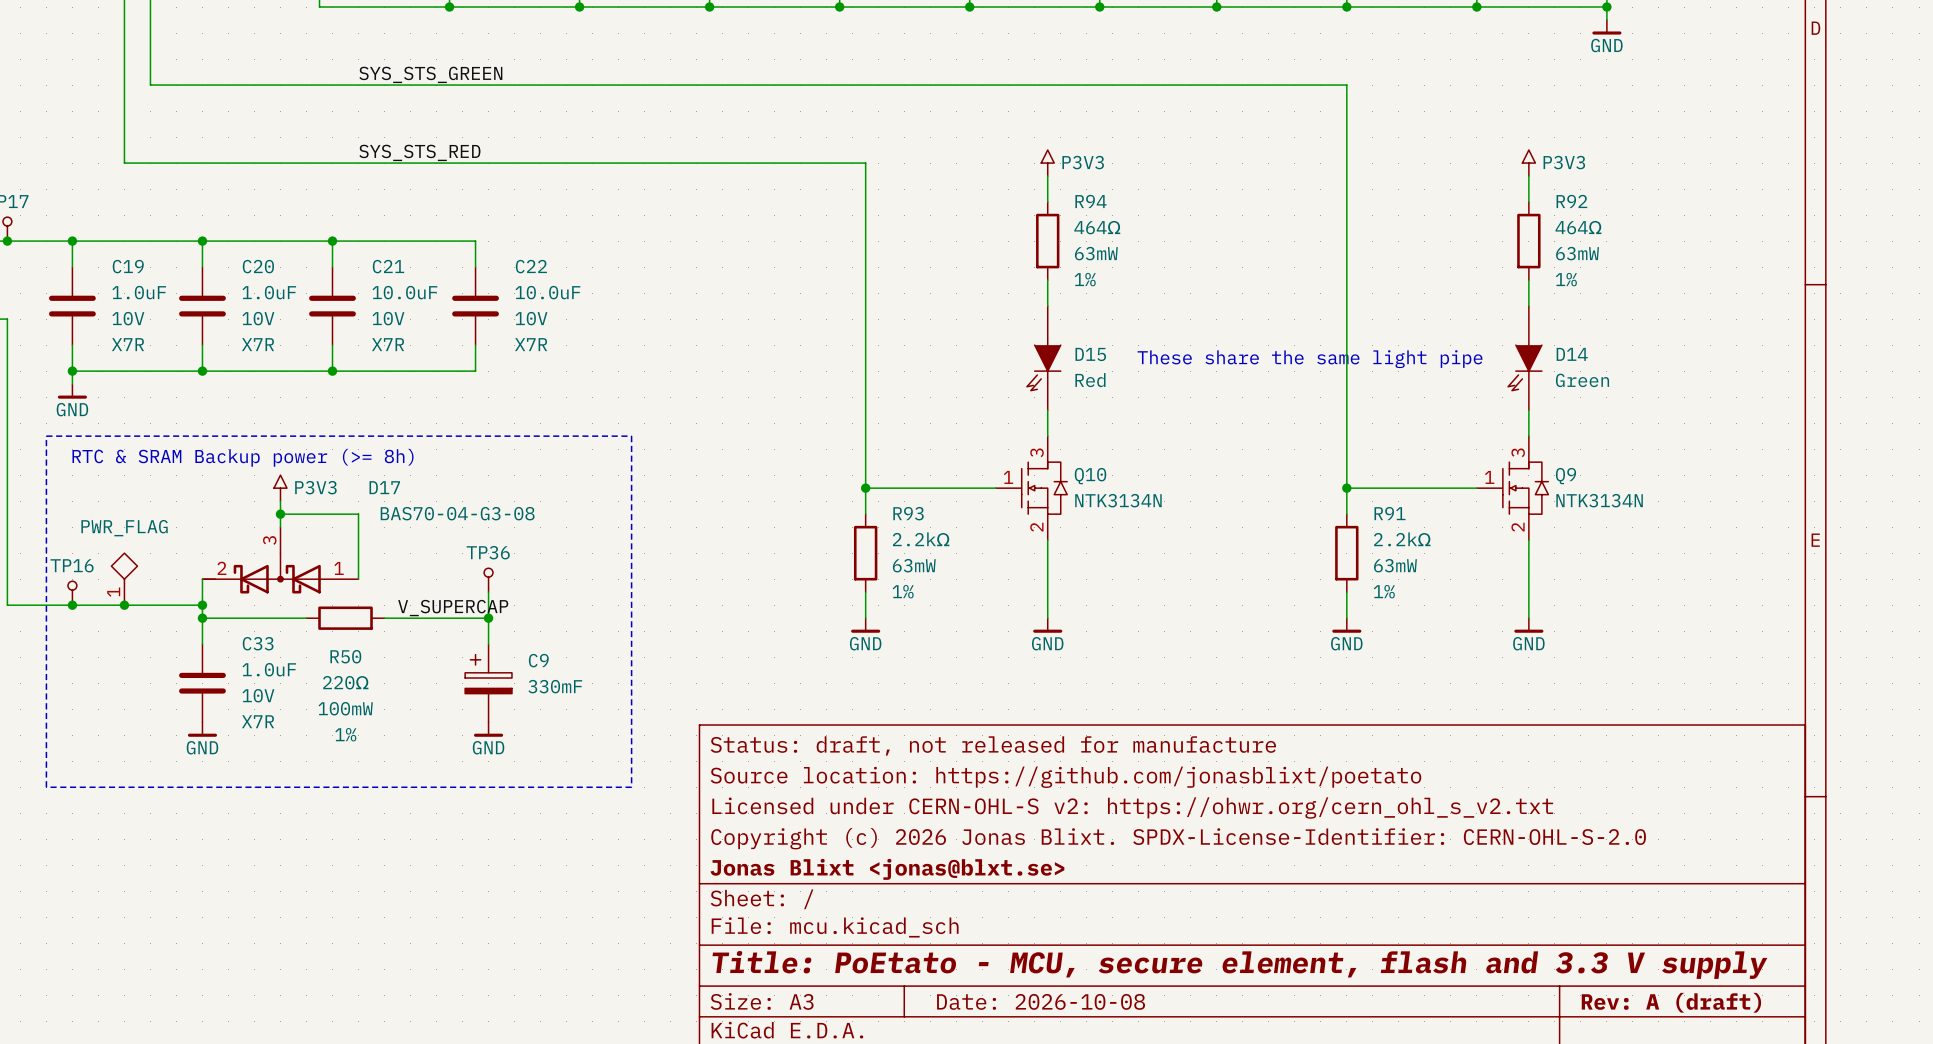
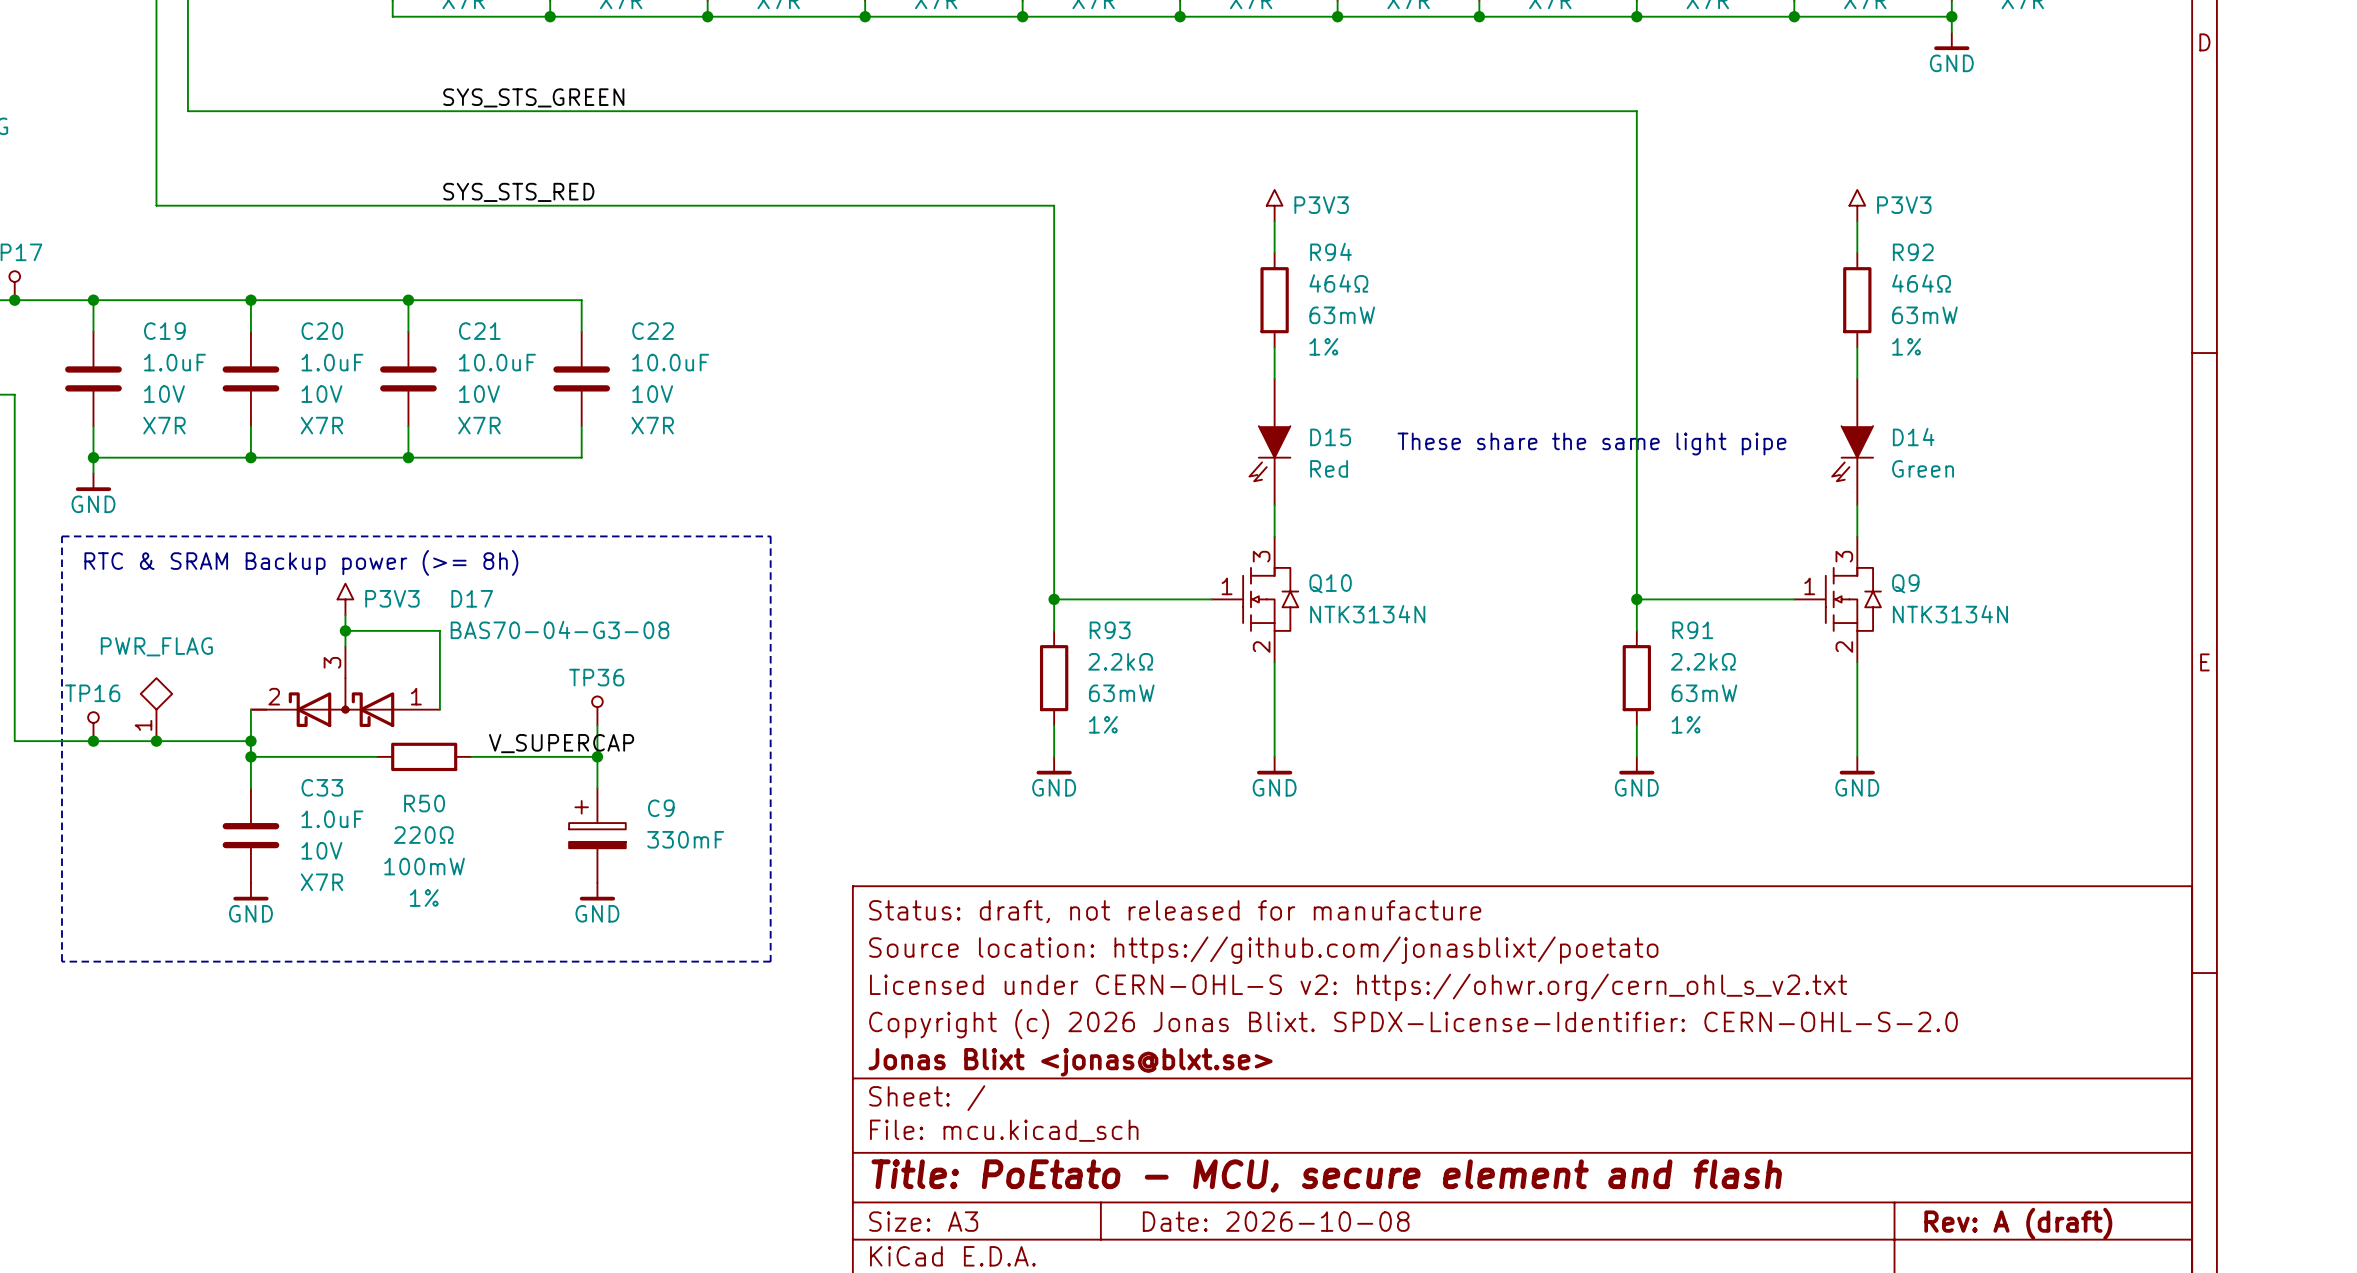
title block: Title: PoEtato - MCU, secure element, flash and 3.3 V supply (1239, 964) -> Title: PoEtato - MCU, secure element and flash (1326, 1176)

